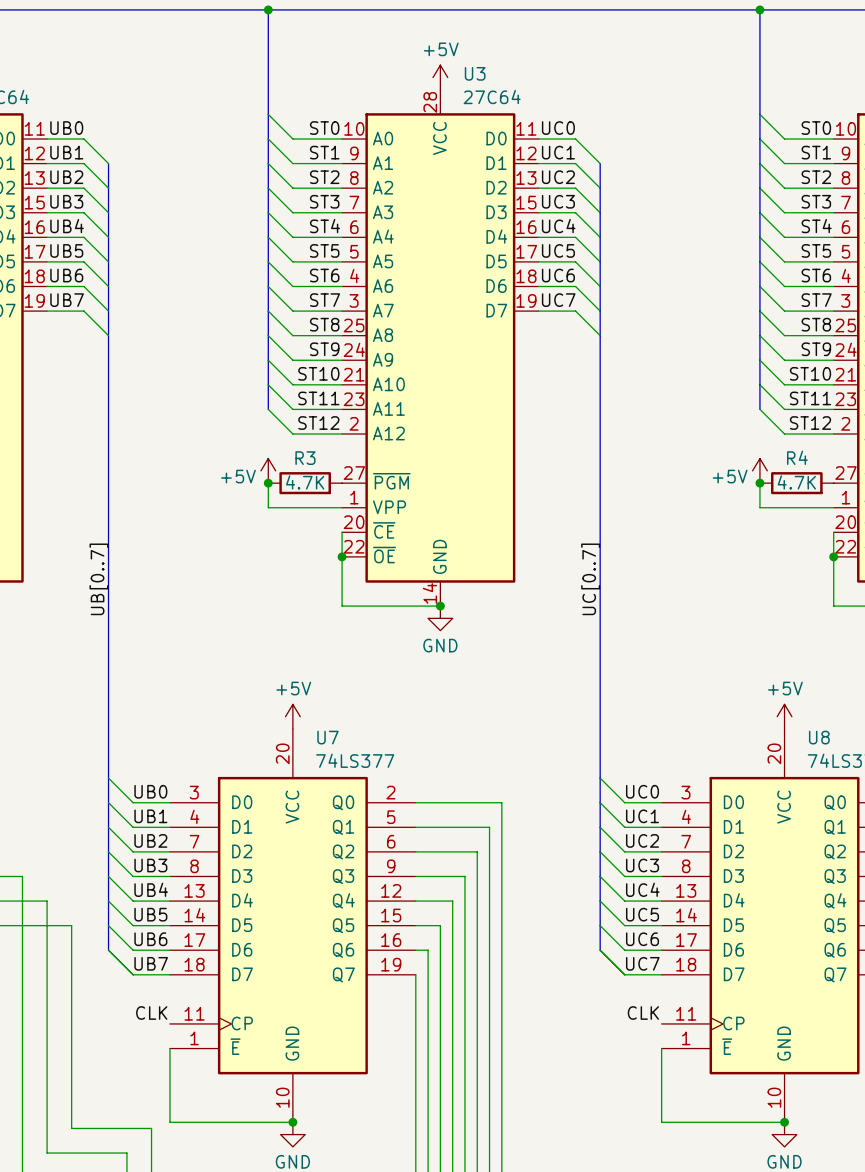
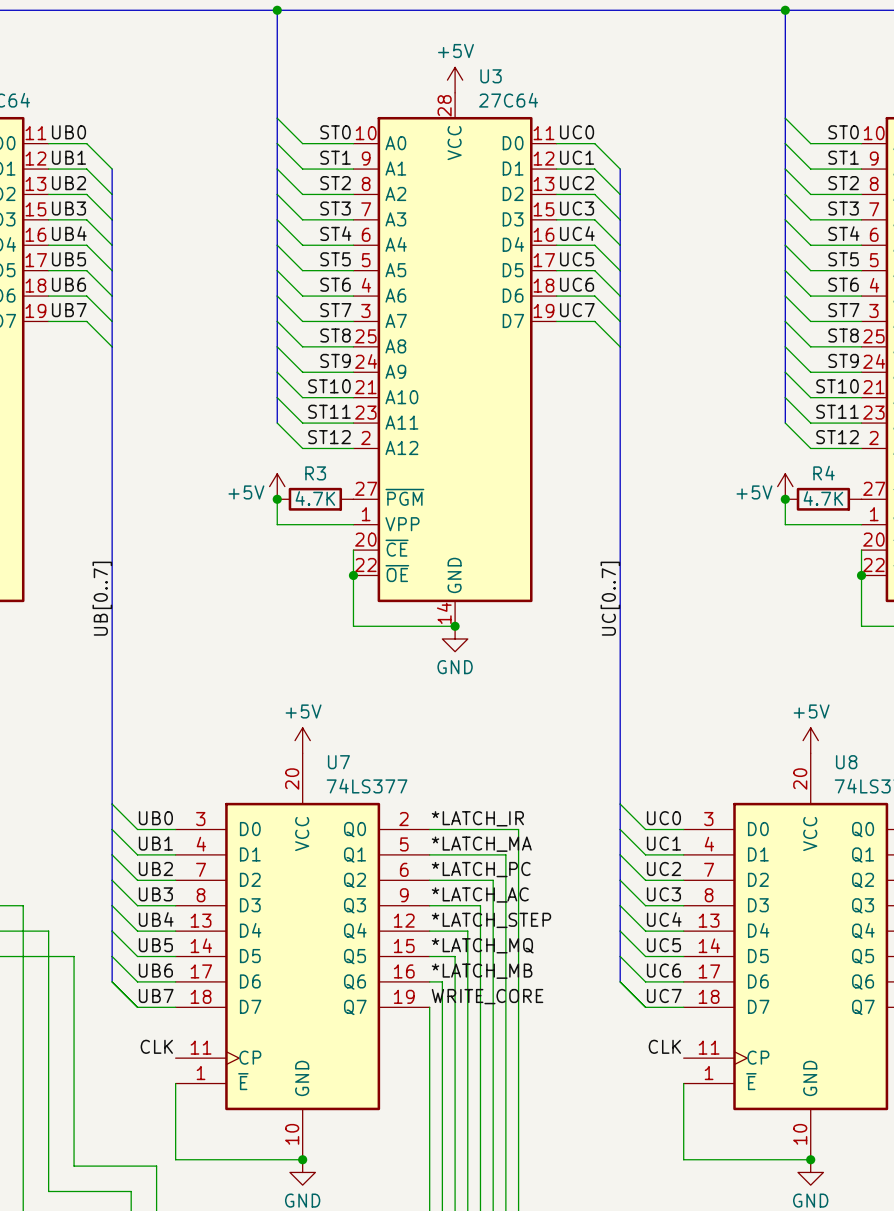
label: none -> *LATCH_IR (477, 818)
label: none -> *LATCH_MA (481, 844)
label: none -> *LATCH_PC (481, 869)
label: none -> *LATCH_AC (480, 894)
label: none -> *LATCH_STEP (491, 920)
label: none -> *LATCH_MQ (482, 945)
label: none -> *LATCH_MB (482, 971)
label: none -> WRITE_CORE (487, 996)

